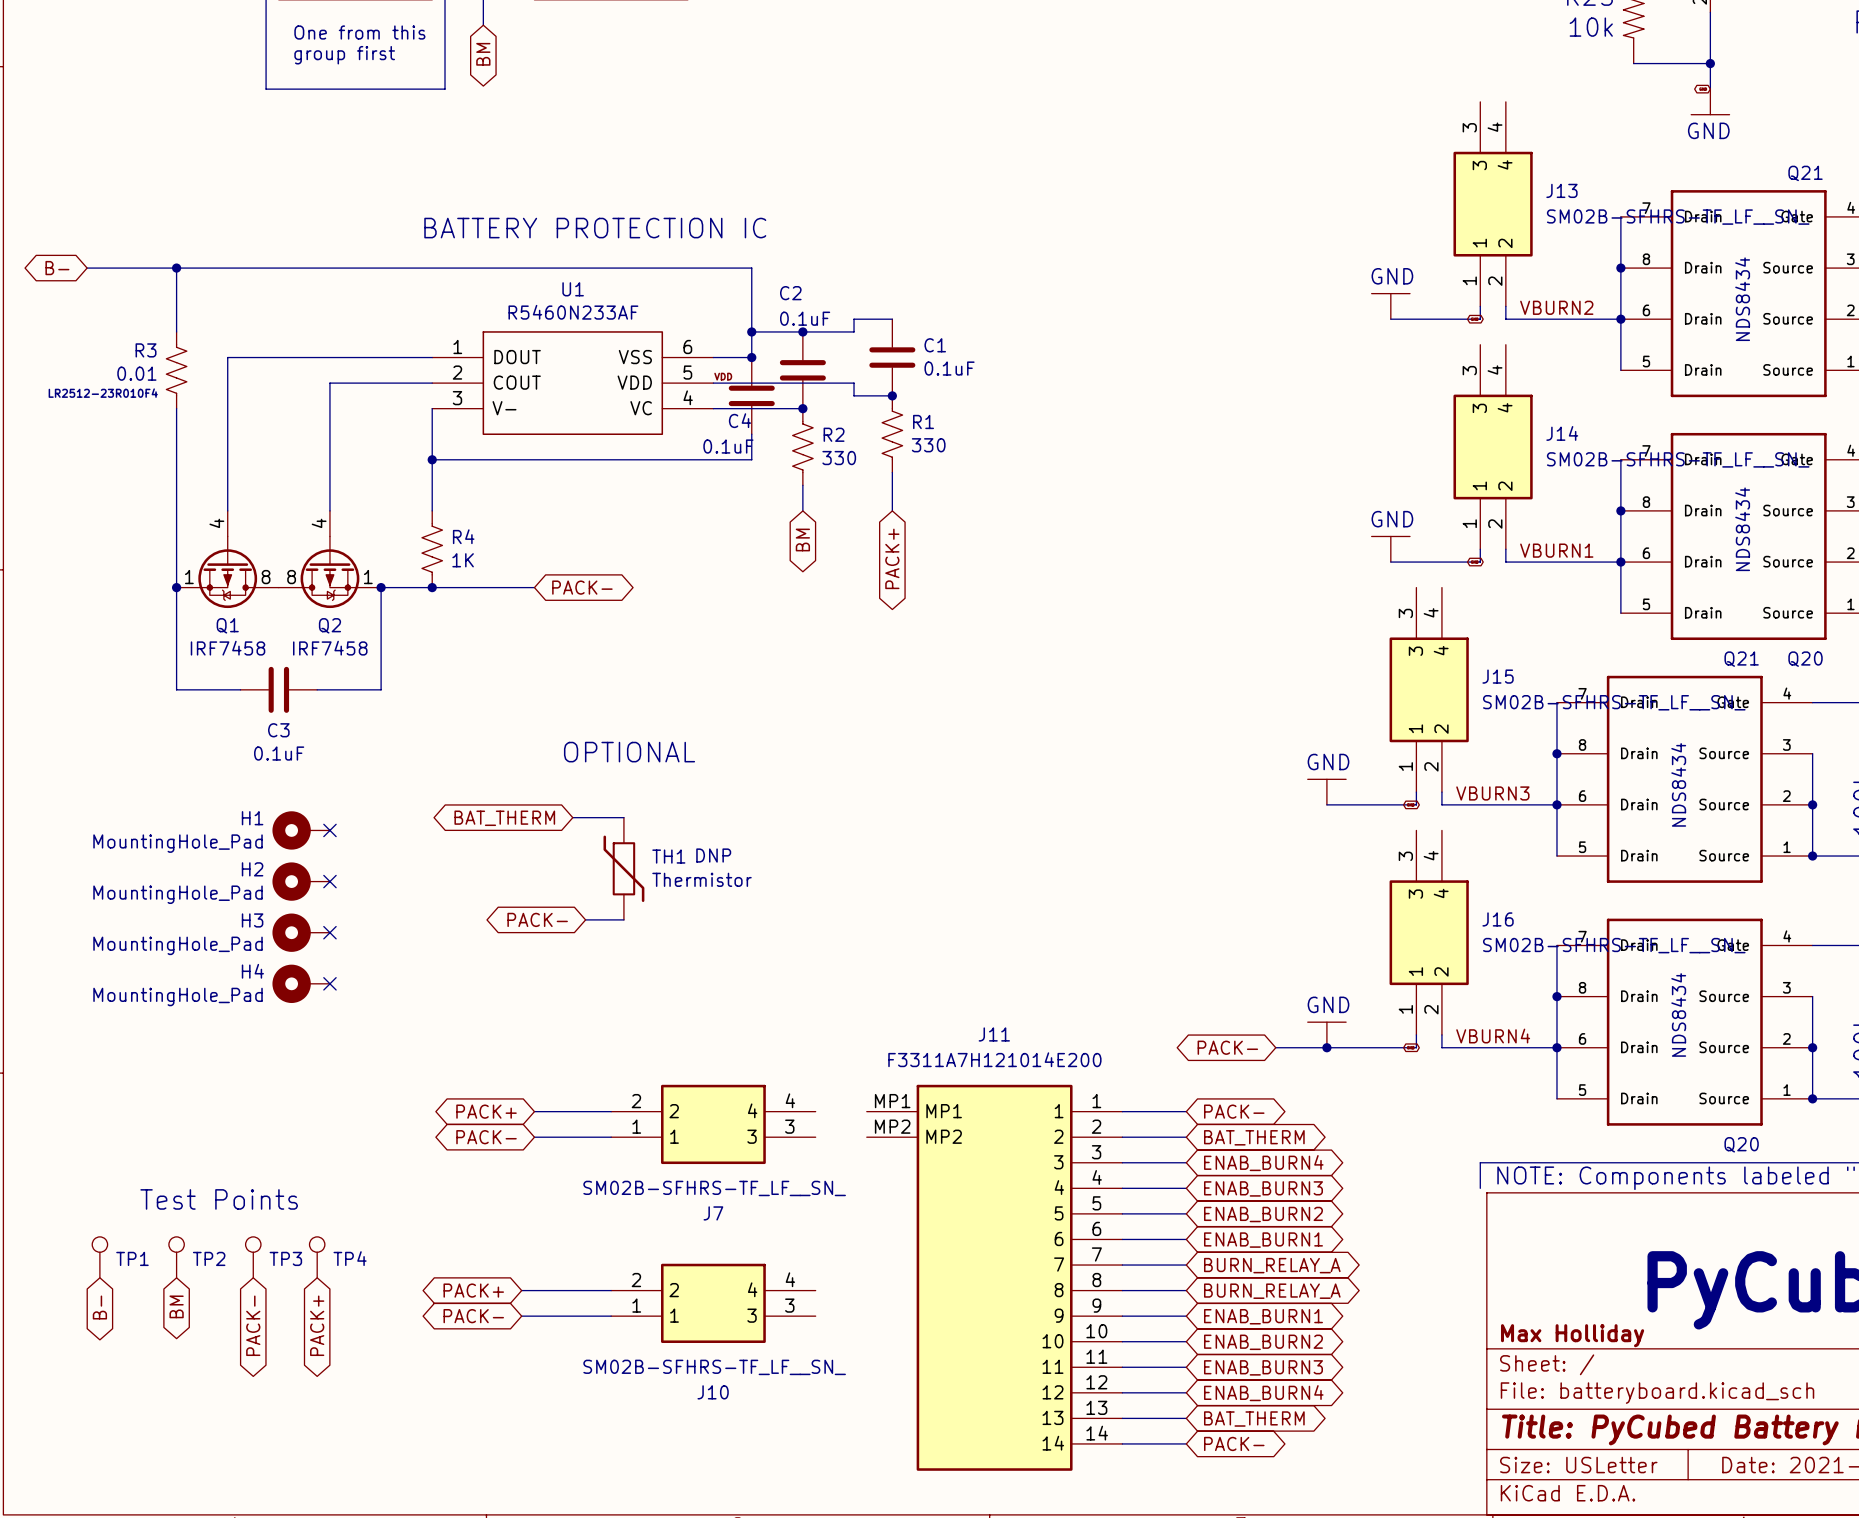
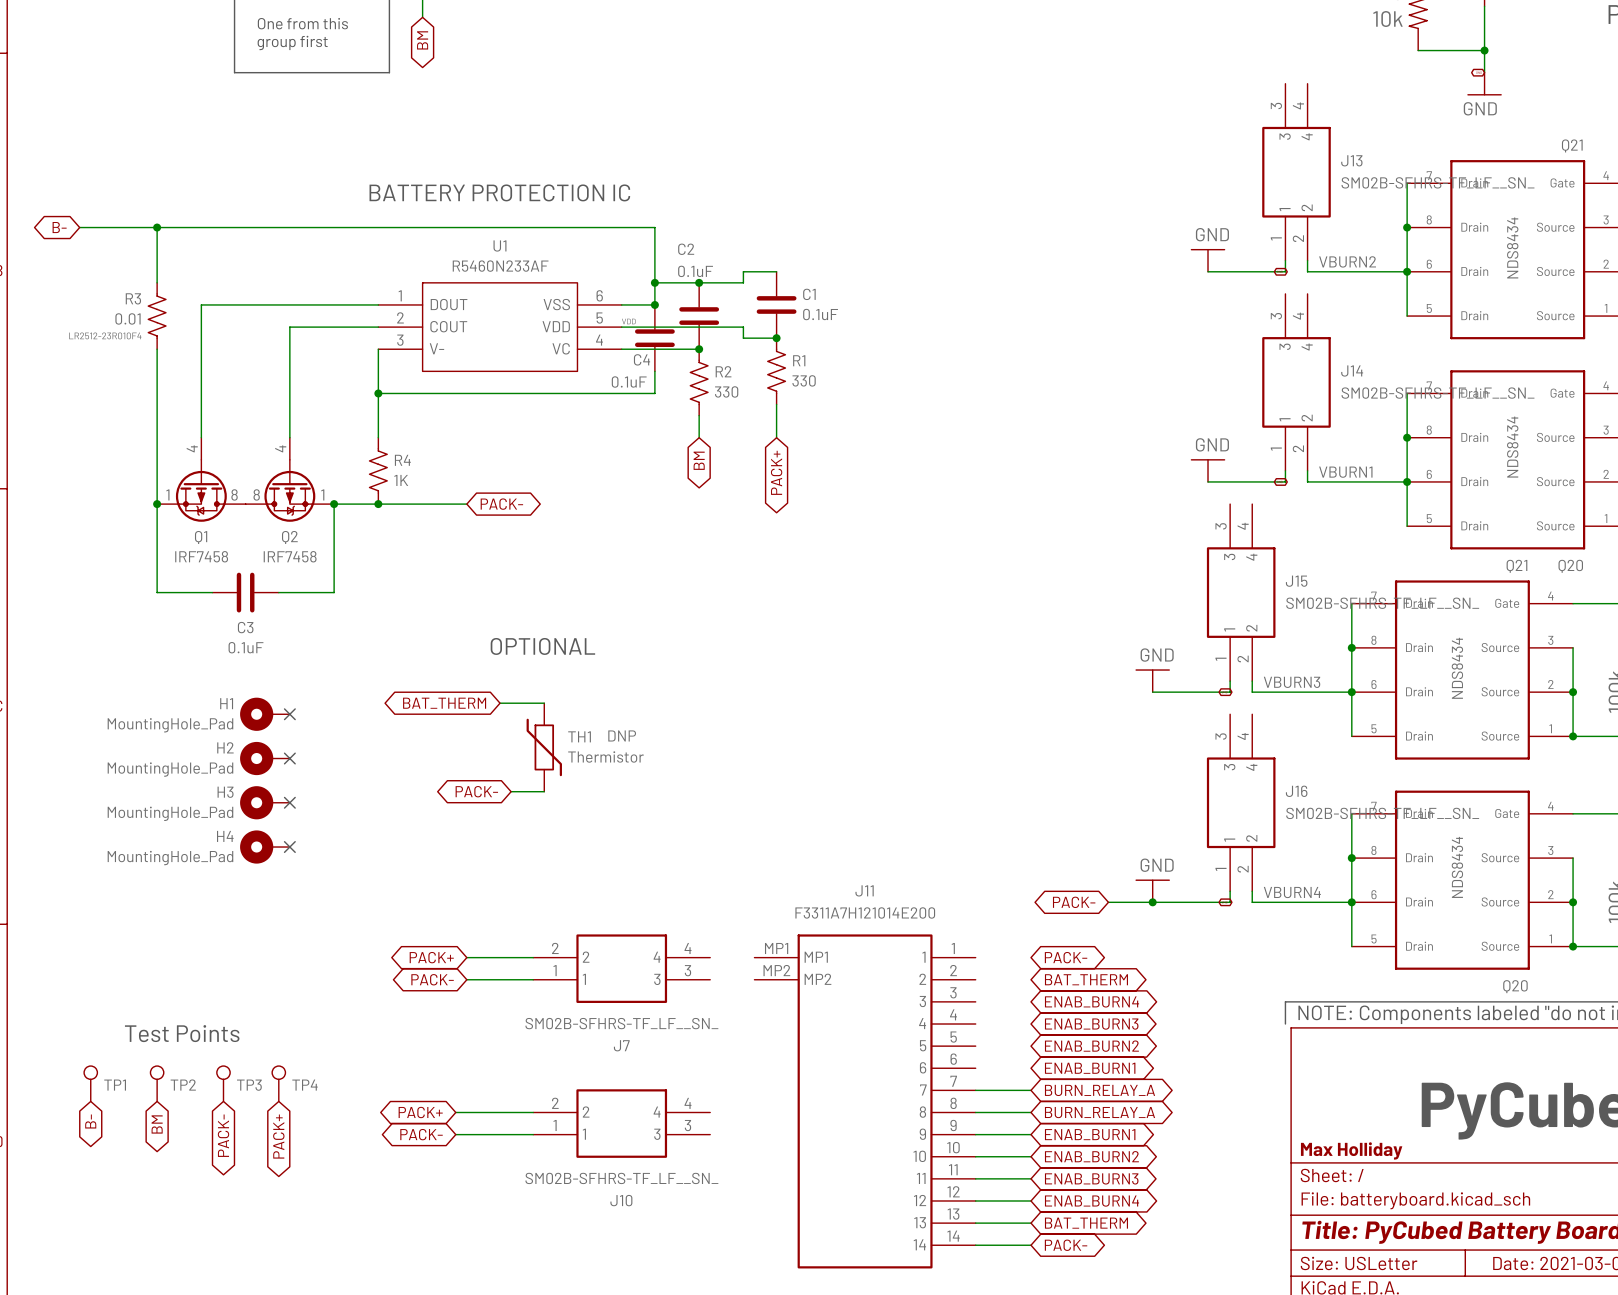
wire: (1122, 1111) (1186, 1111) -> none
wire: (1122, 1137) (1186, 1137) -> none
wire: (1122, 1162) (1186, 1162) -> none
wire: (1122, 1188) (1186, 1188) -> none
wire: (1122, 1213) (1186, 1213) -> none
wire: (1122, 1239) (1186, 1239) -> none

